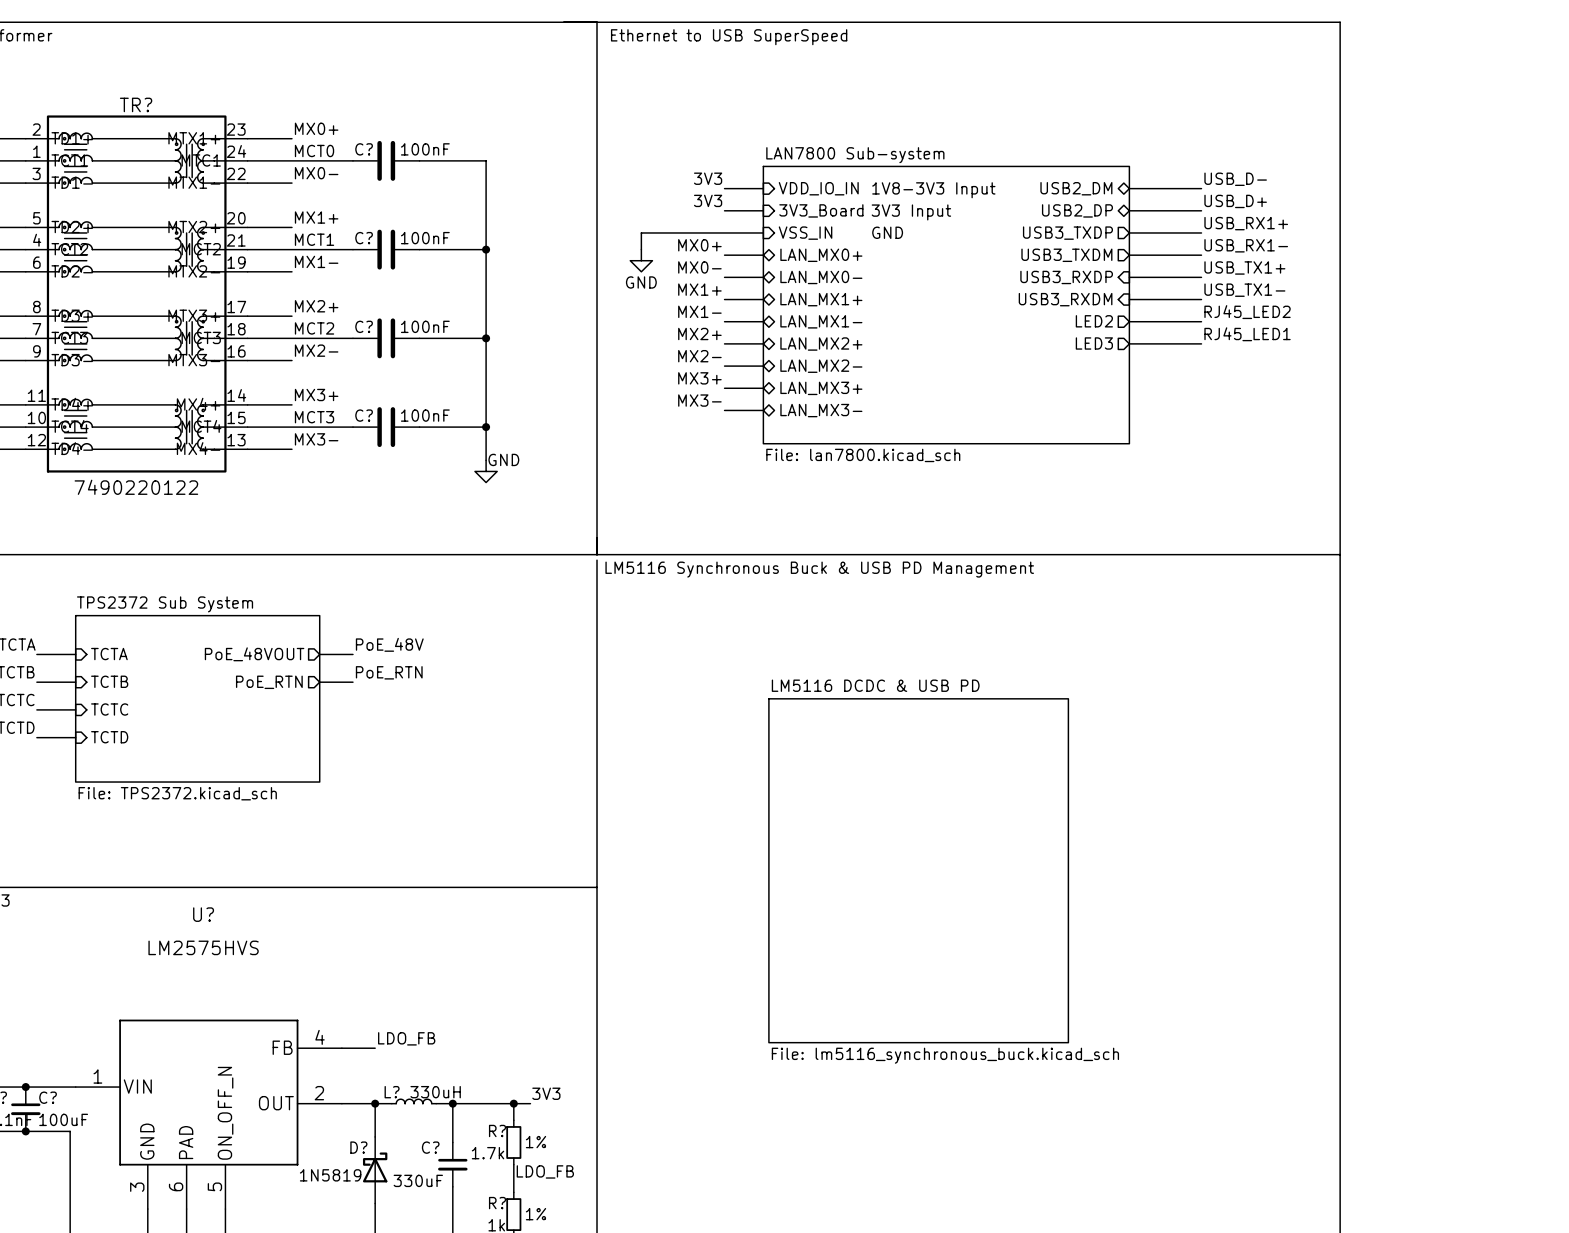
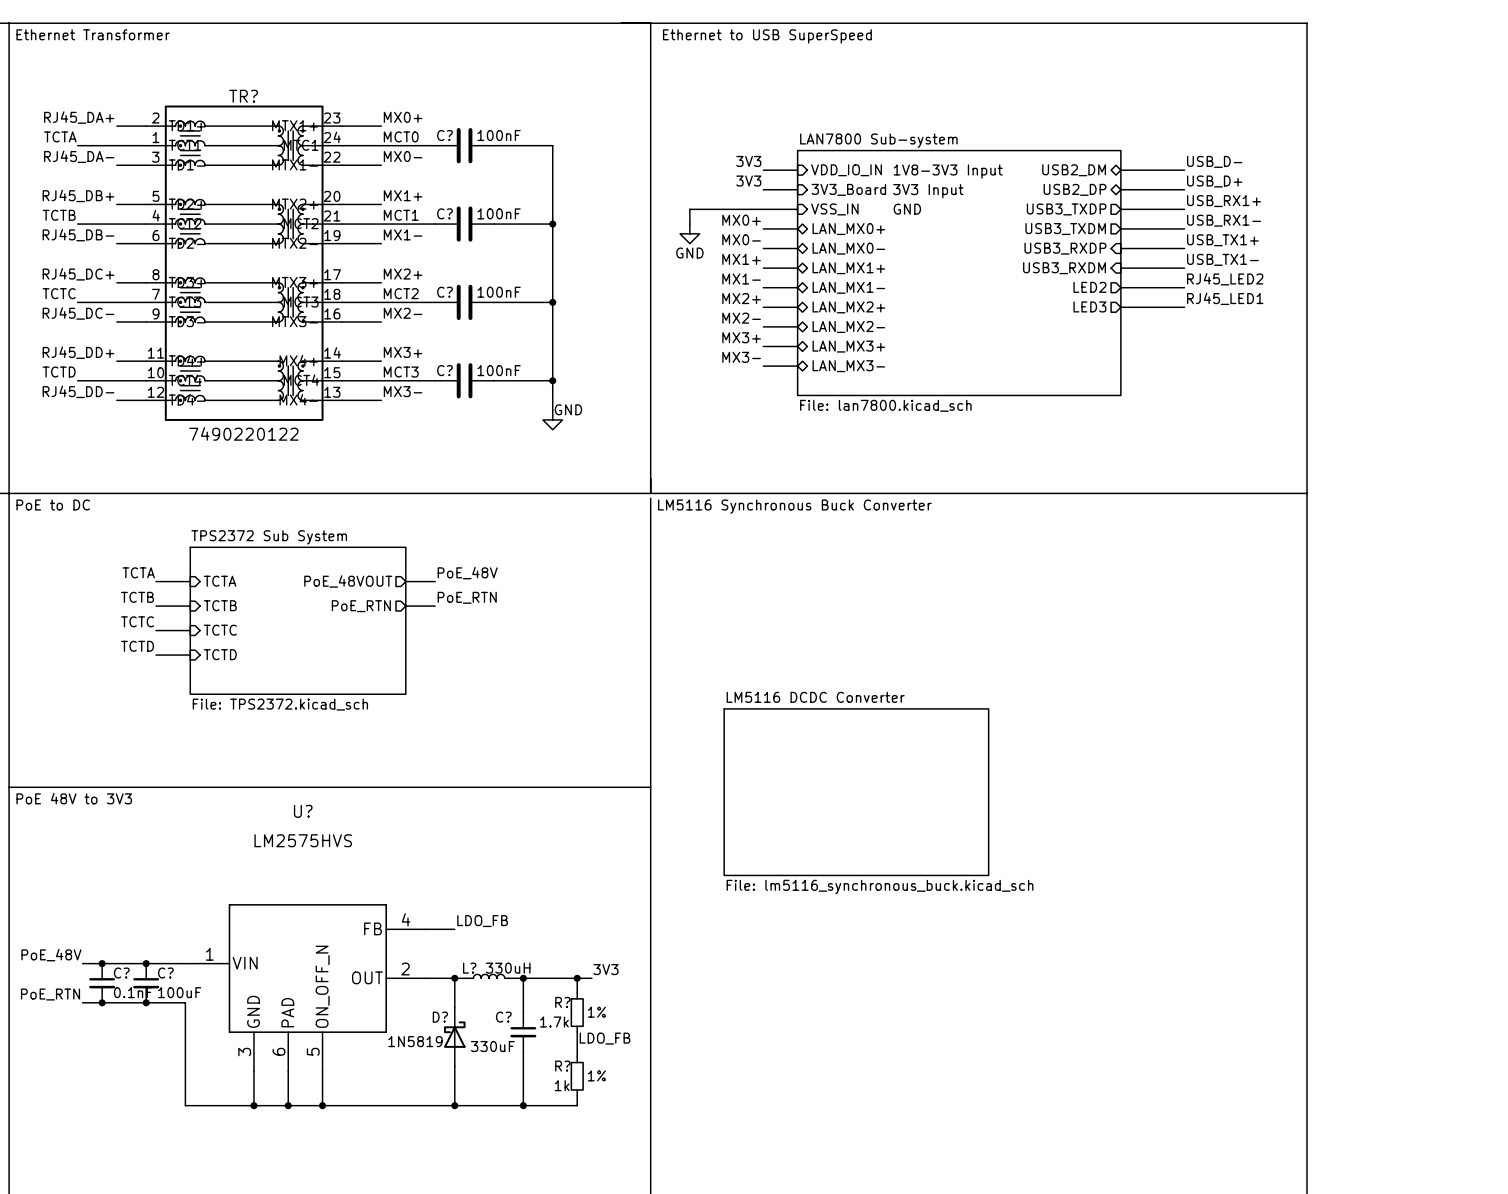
text: LM5116 Synchronous Buck & USB PD Management (819, 569) -> LM5116 Synchronous Buck Converter (794, 506)
sheet LM5116 DCDC & USB PD: File: lm5116_synchronous_buck.kicad_sch (918, 870) -> none
sheet LM5116 DCDC Converter: none -> File: lm5116_synchronous_buck.kicad_sch (856, 792)

